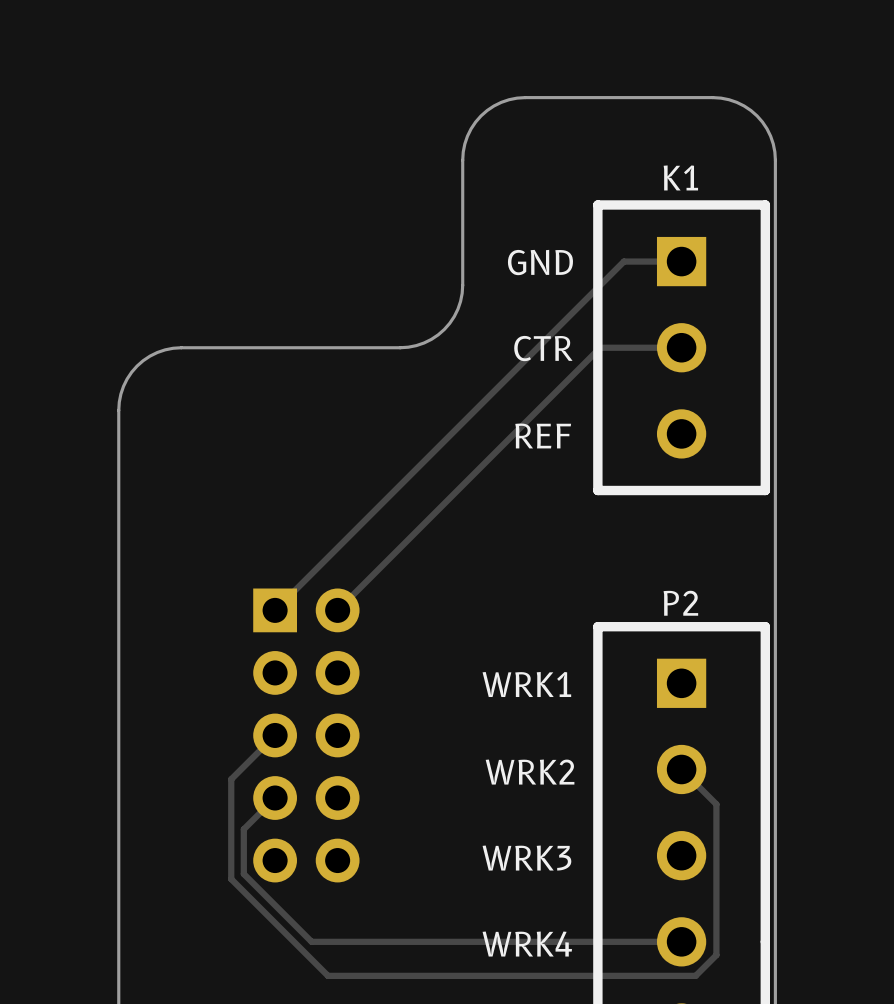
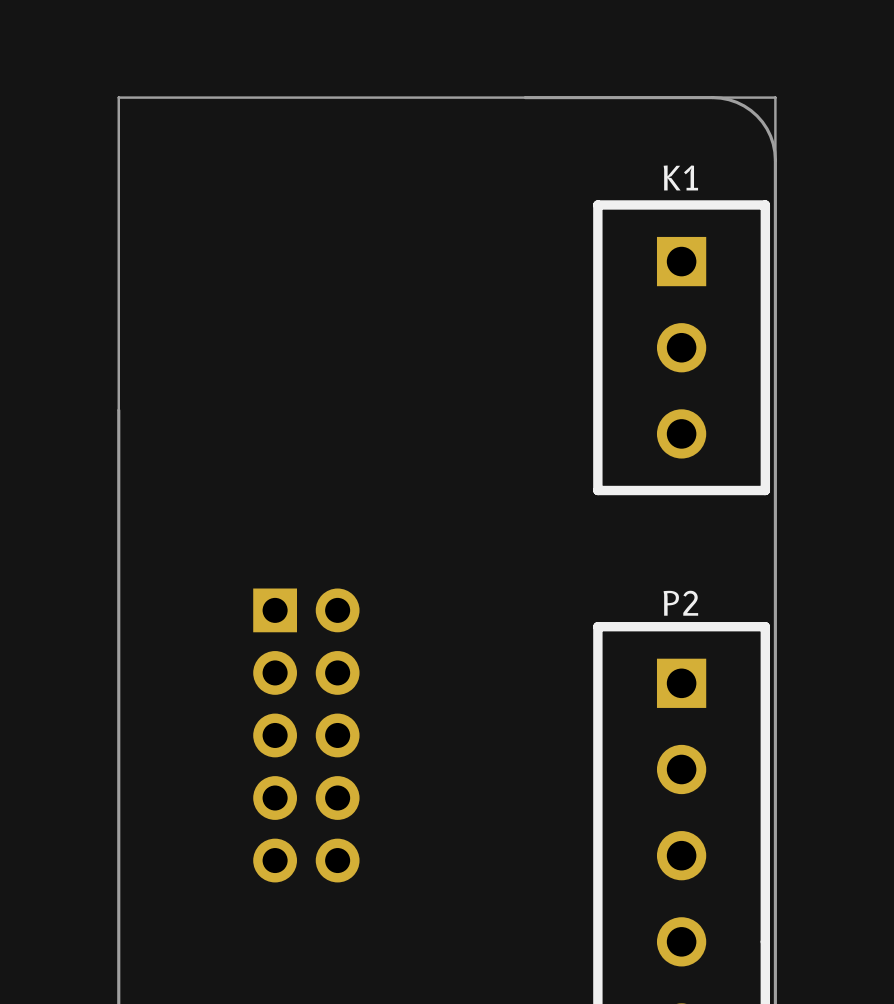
board edge: (525, 97) (509, 99) (493, 105) (481, 115) (467, 136) (462, 160) (462, 293) (454, 316) (438, 334) (424, 342) (400, 347) (181, 347) (165, 349) (150, 356) (131, 372) (123, 386) (118, 410) -> (525, 97) (118, 97) (118, 410)
board edge: none -> (712, 97) (775, 97) (775, 160)
track: (681, 261) (623, 261) (275, 610) -> none
text: GND (540, 262) -> none
track: (681, 347) (600, 347) (337, 610) -> none
text: CTR (543, 348) -> none
text: REF (543, 435) -> none
text: WRK1 (526, 684) -> none
track: (275, 735) (231, 779) (231, 879) (327, 975) (695, 975) (716, 955) (716, 804) (681, 769) -> none
text: WRK2 (530, 772) -> none
track: (275, 798) (243, 829) (243, 874) (311, 941) (681, 941) -> none
text: WRK3 (526, 858) -> none
text: WRK4 (527, 944) -> none

